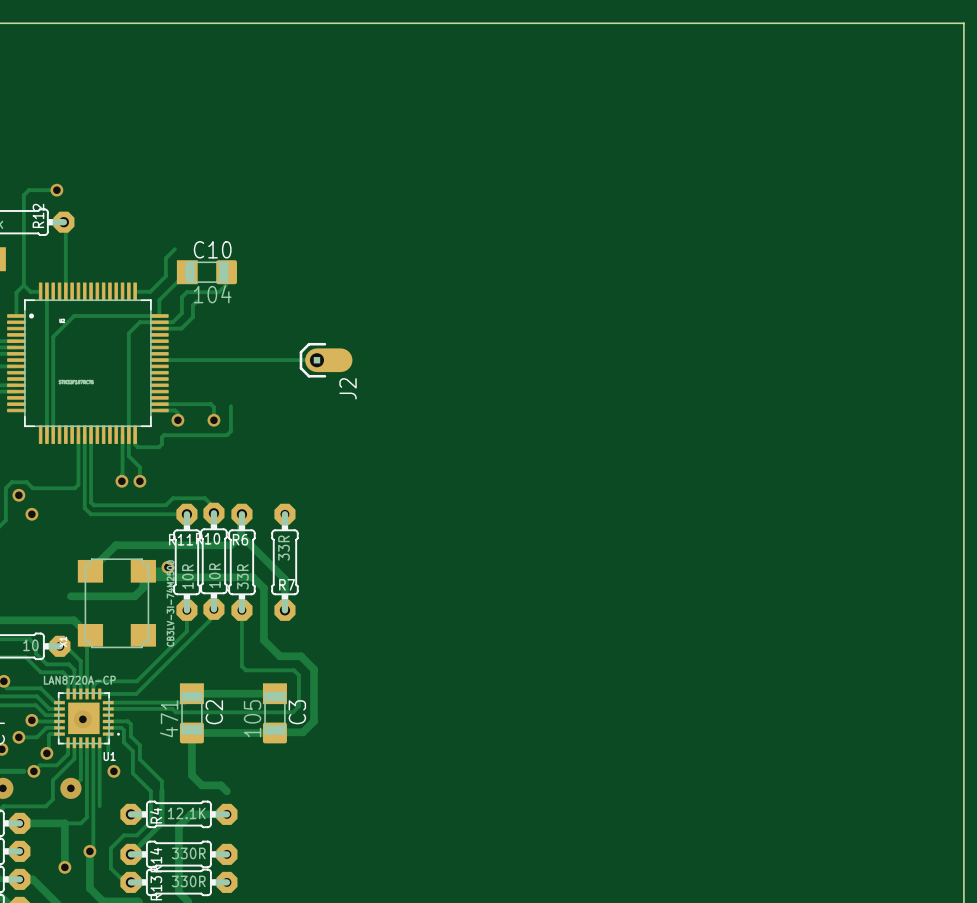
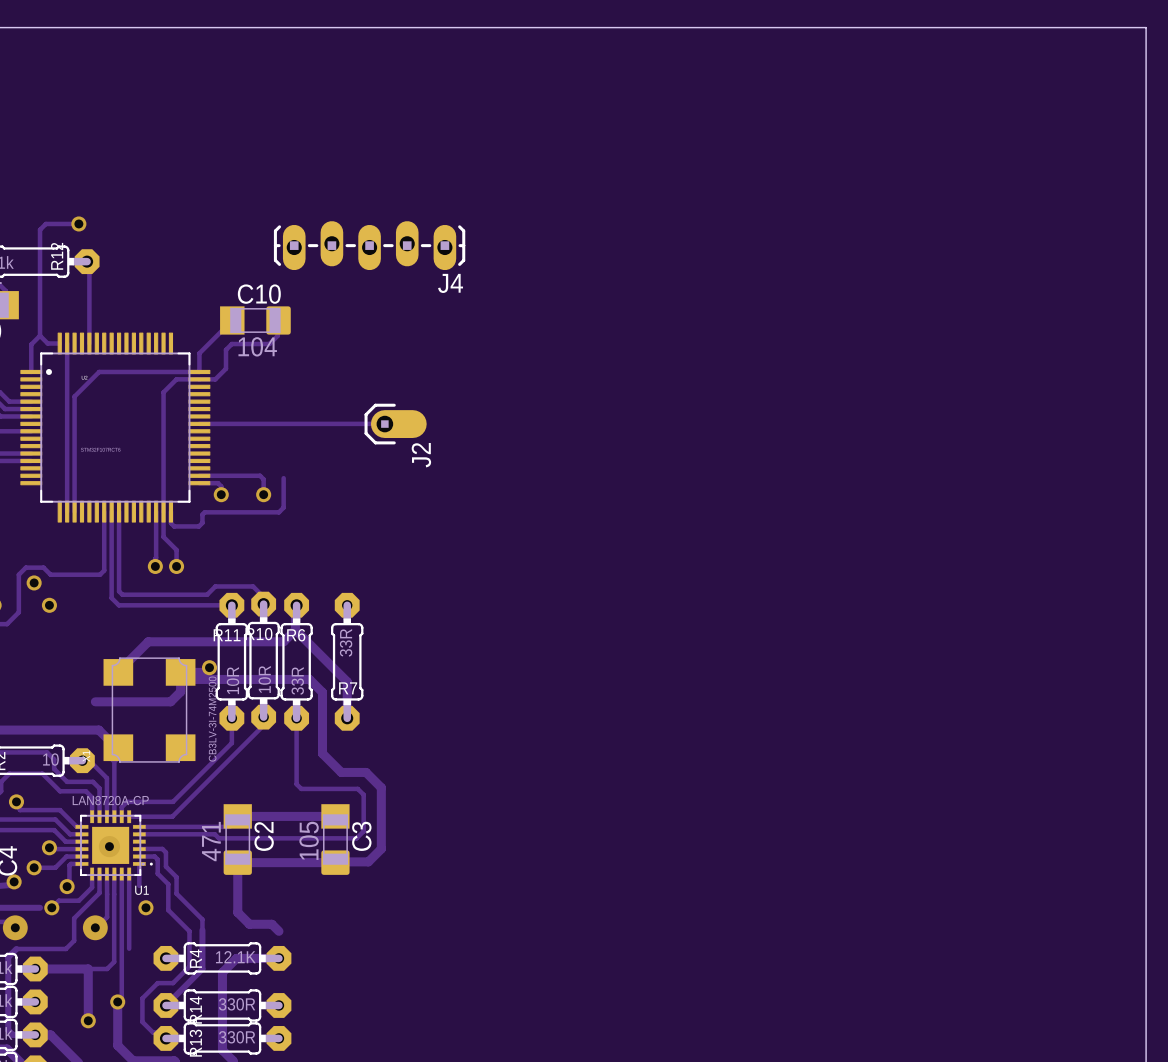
J4: none -> (369, 245)
track: (174, 249) (165, 258) (165, 276) (150, 291) (135, 291) -> none
track: (196, 301) (192, 305) (192, 317) (181, 328) (159, 328) -> none

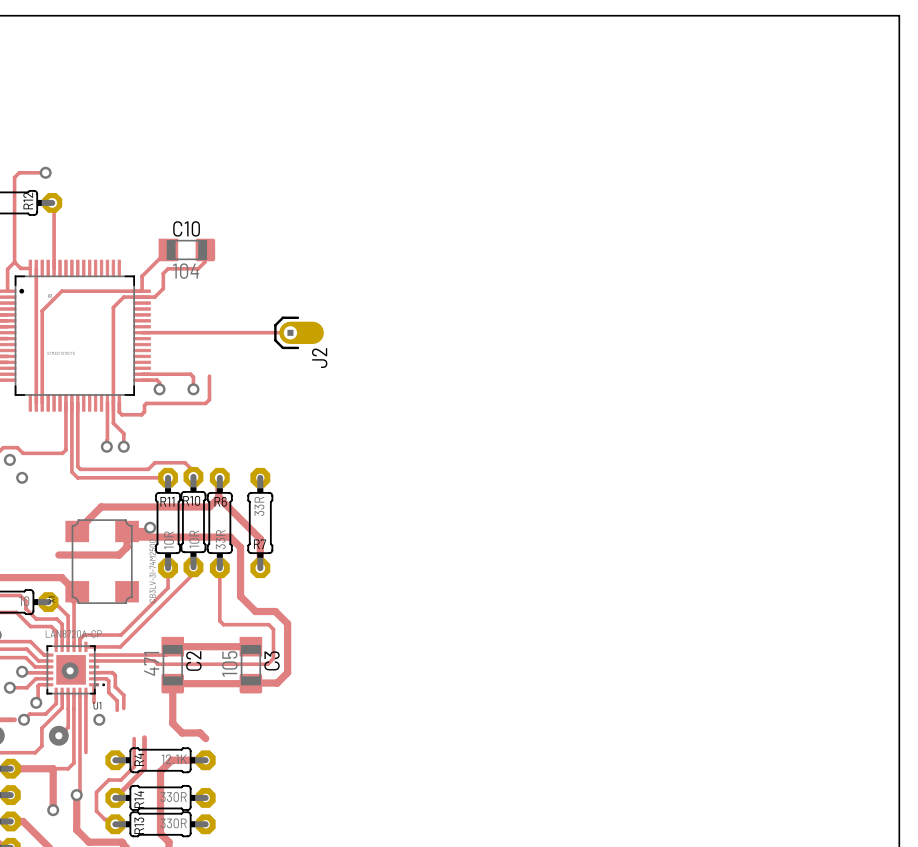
J4: (369, 245) -> none
track: (176, 893) (202, 919) (202, 930) -> none
track: (168, 896) (168, 910) (189, 931) -> none

